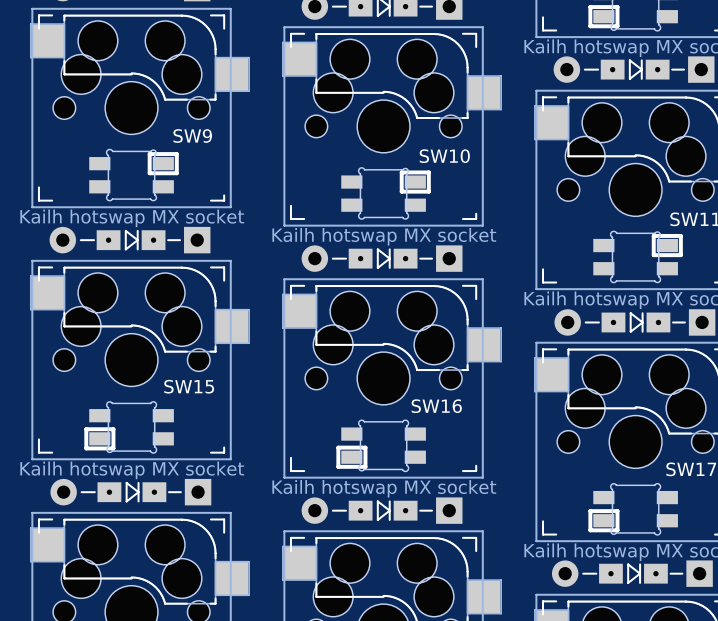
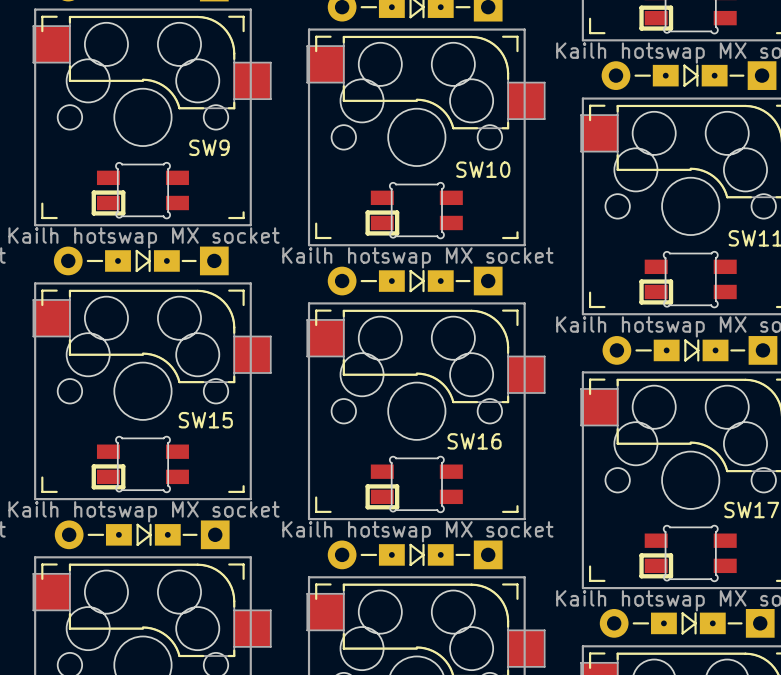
part rotation: 0° (134, 175) -> 180° (140, 190)
part rotation: 0° (386, 193) -> 180° (414, 210)
part rotation: 0° (638, 256) -> 180° (688, 279)

